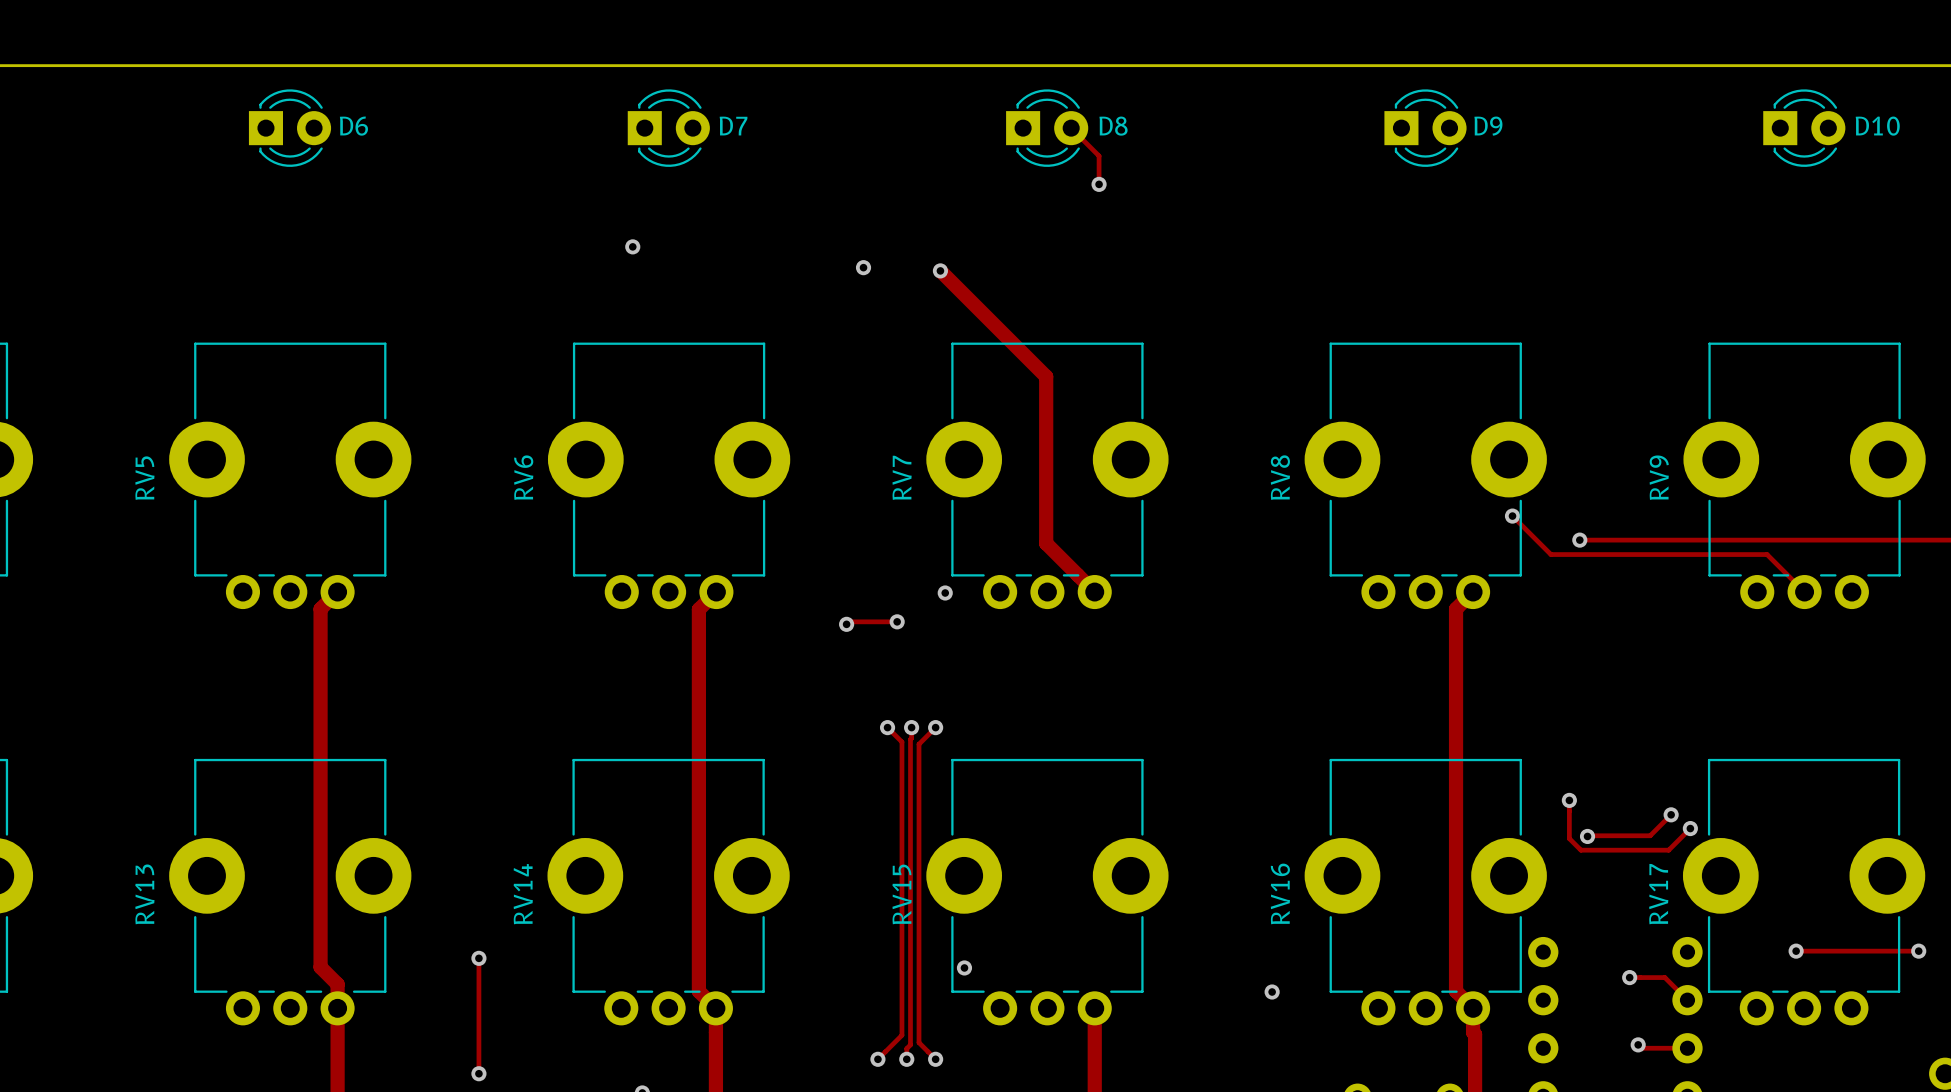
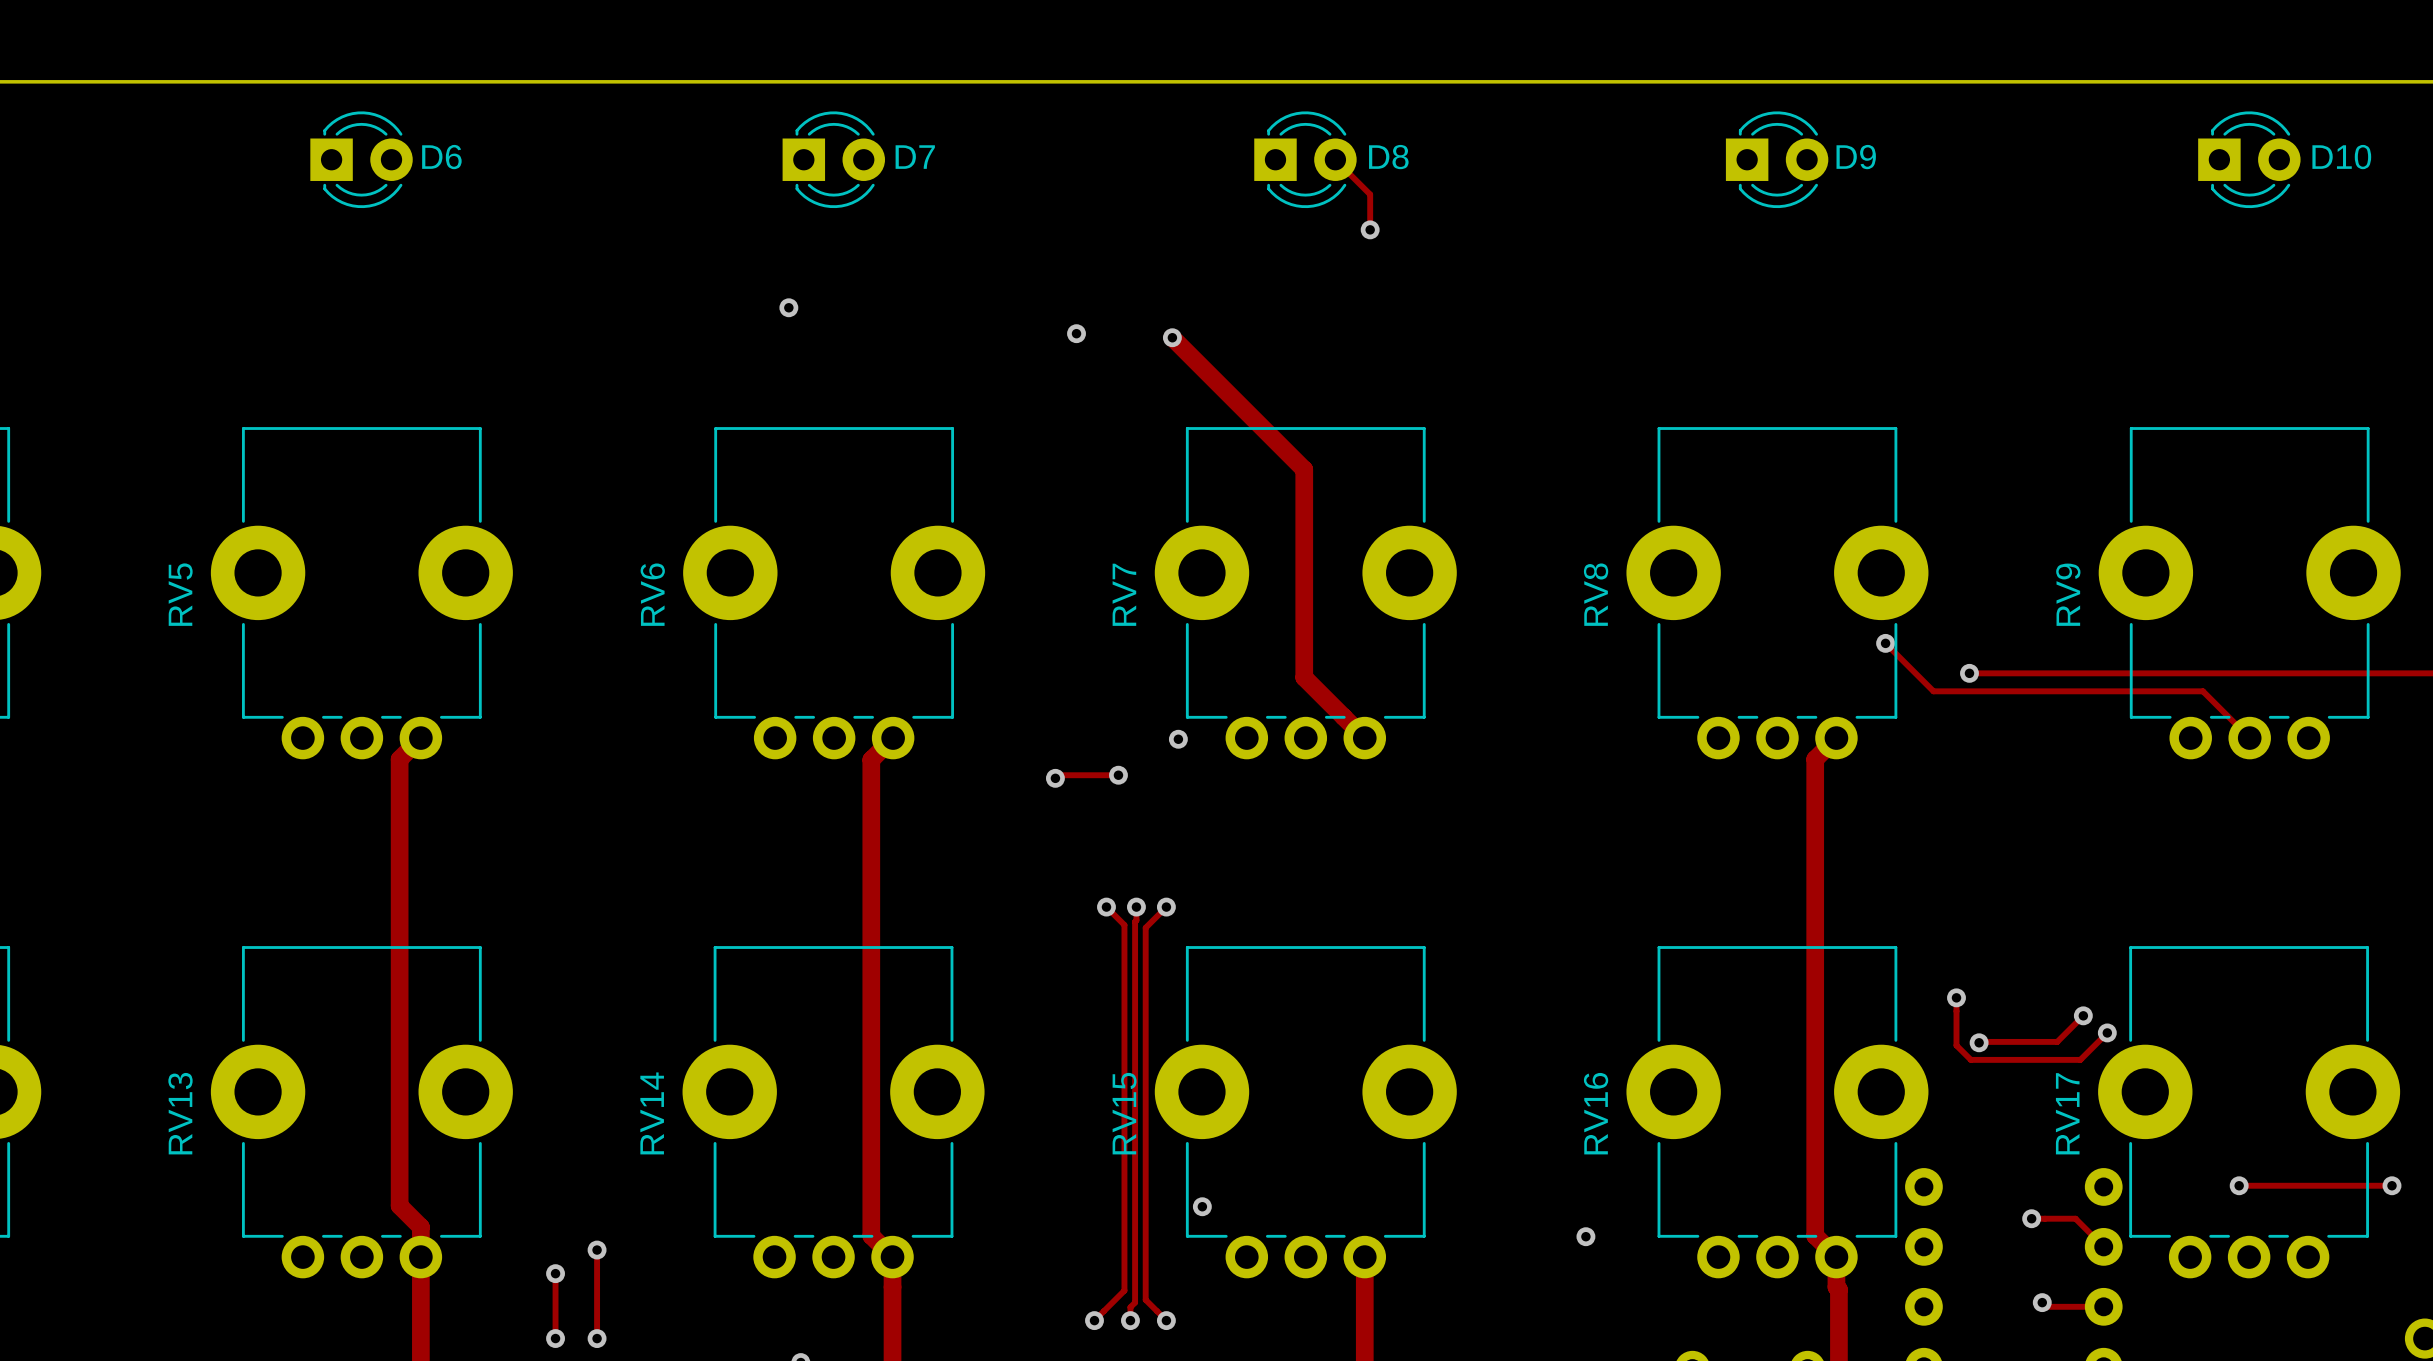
track: (478, 958) (478, 1002) -> none
via: (478, 958) -> none
via: none -> (597, 1250)
track: none -> (555, 1273) (555, 1338)
via: none -> (555, 1273)
via: none -> (555, 1338)

